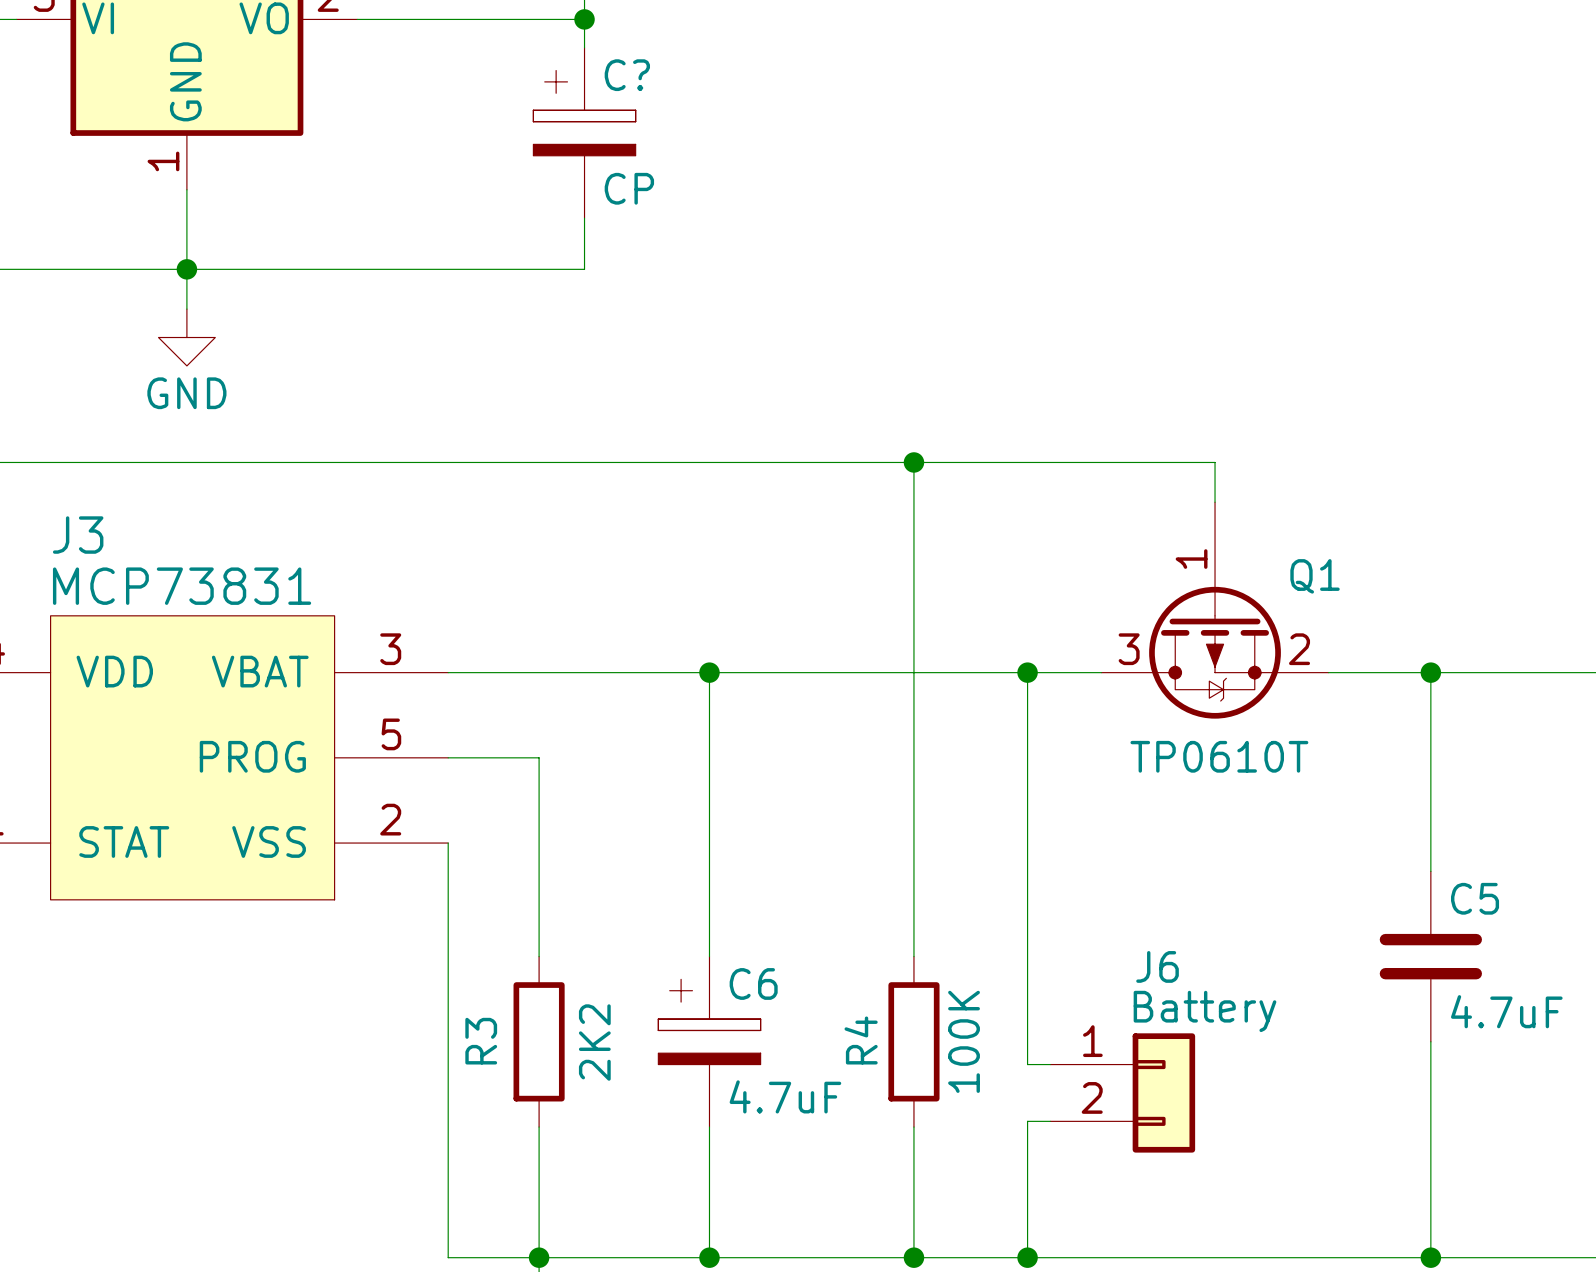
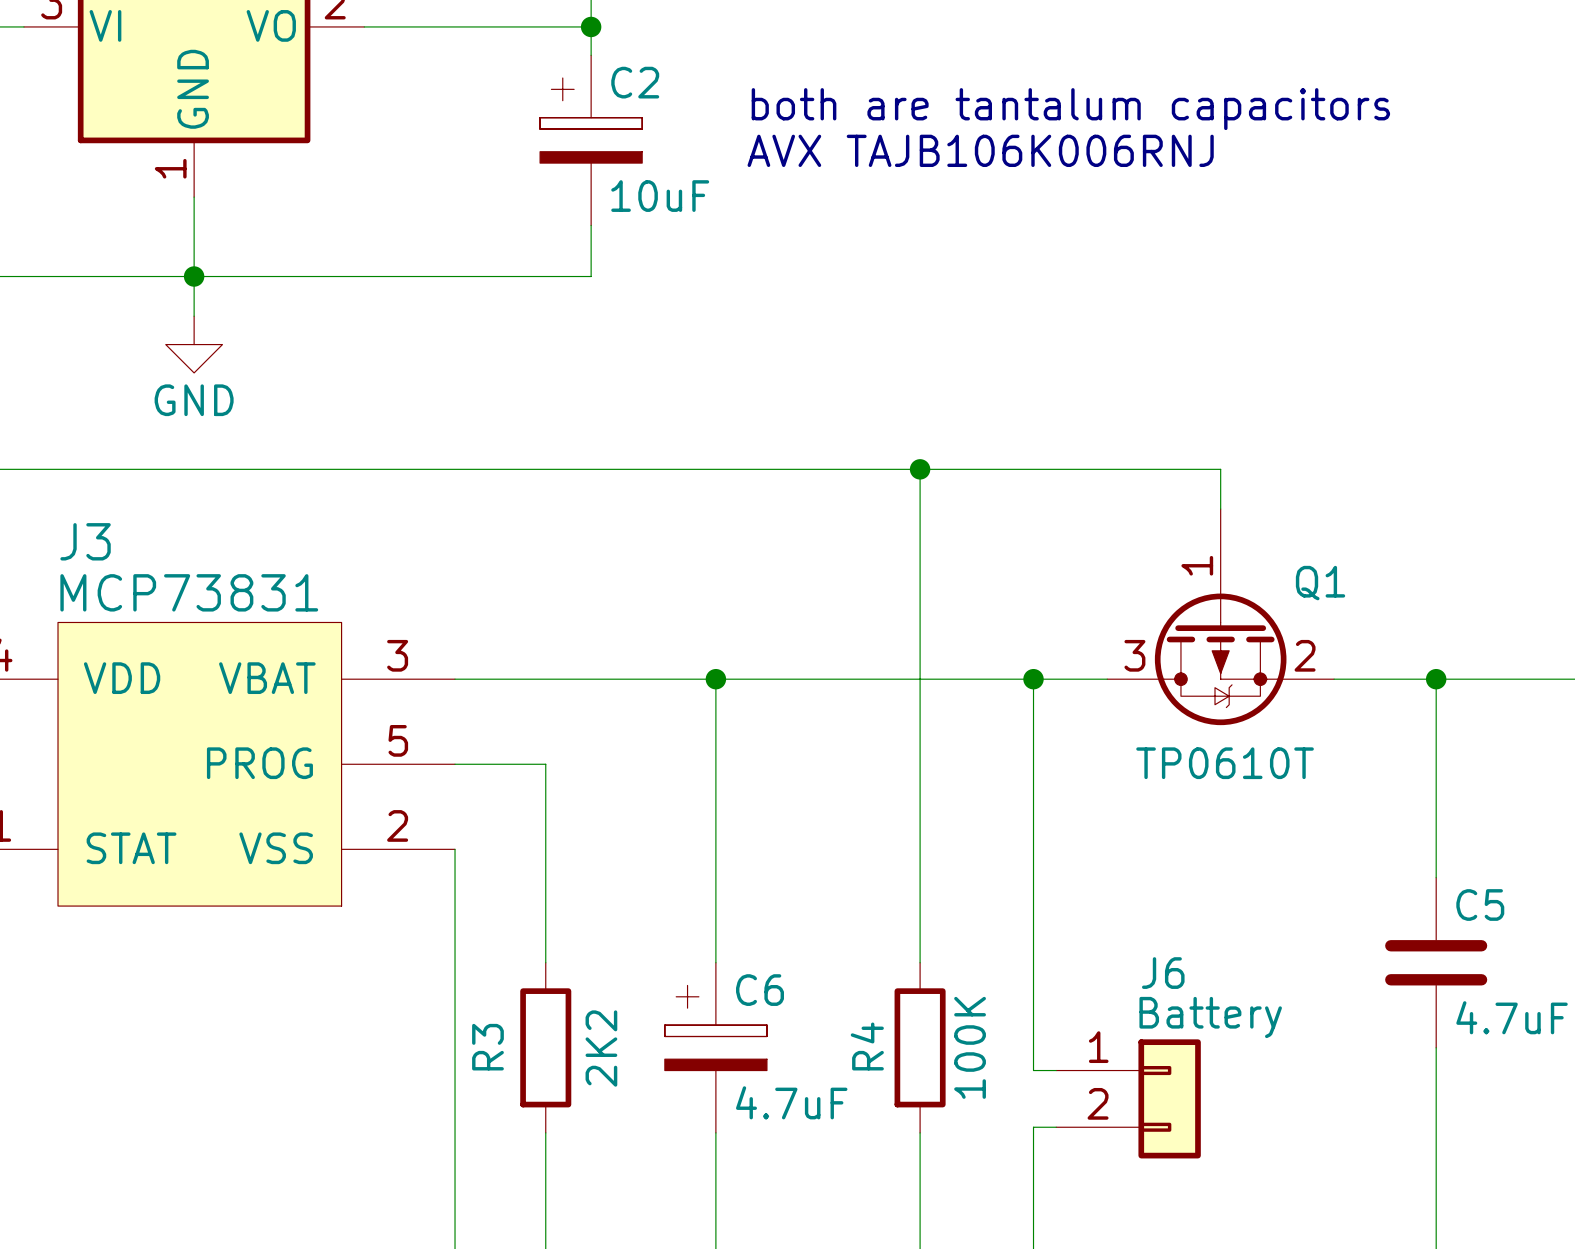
C? name: C? (627, 75) -> C2 (635, 82)
text: none -> both are tantalum capacitors (1070, 109)
text: none -> AVX TAJB106K006RNJ (980, 150)
C? value: CP (629, 188) -> 10uF (660, 196)

